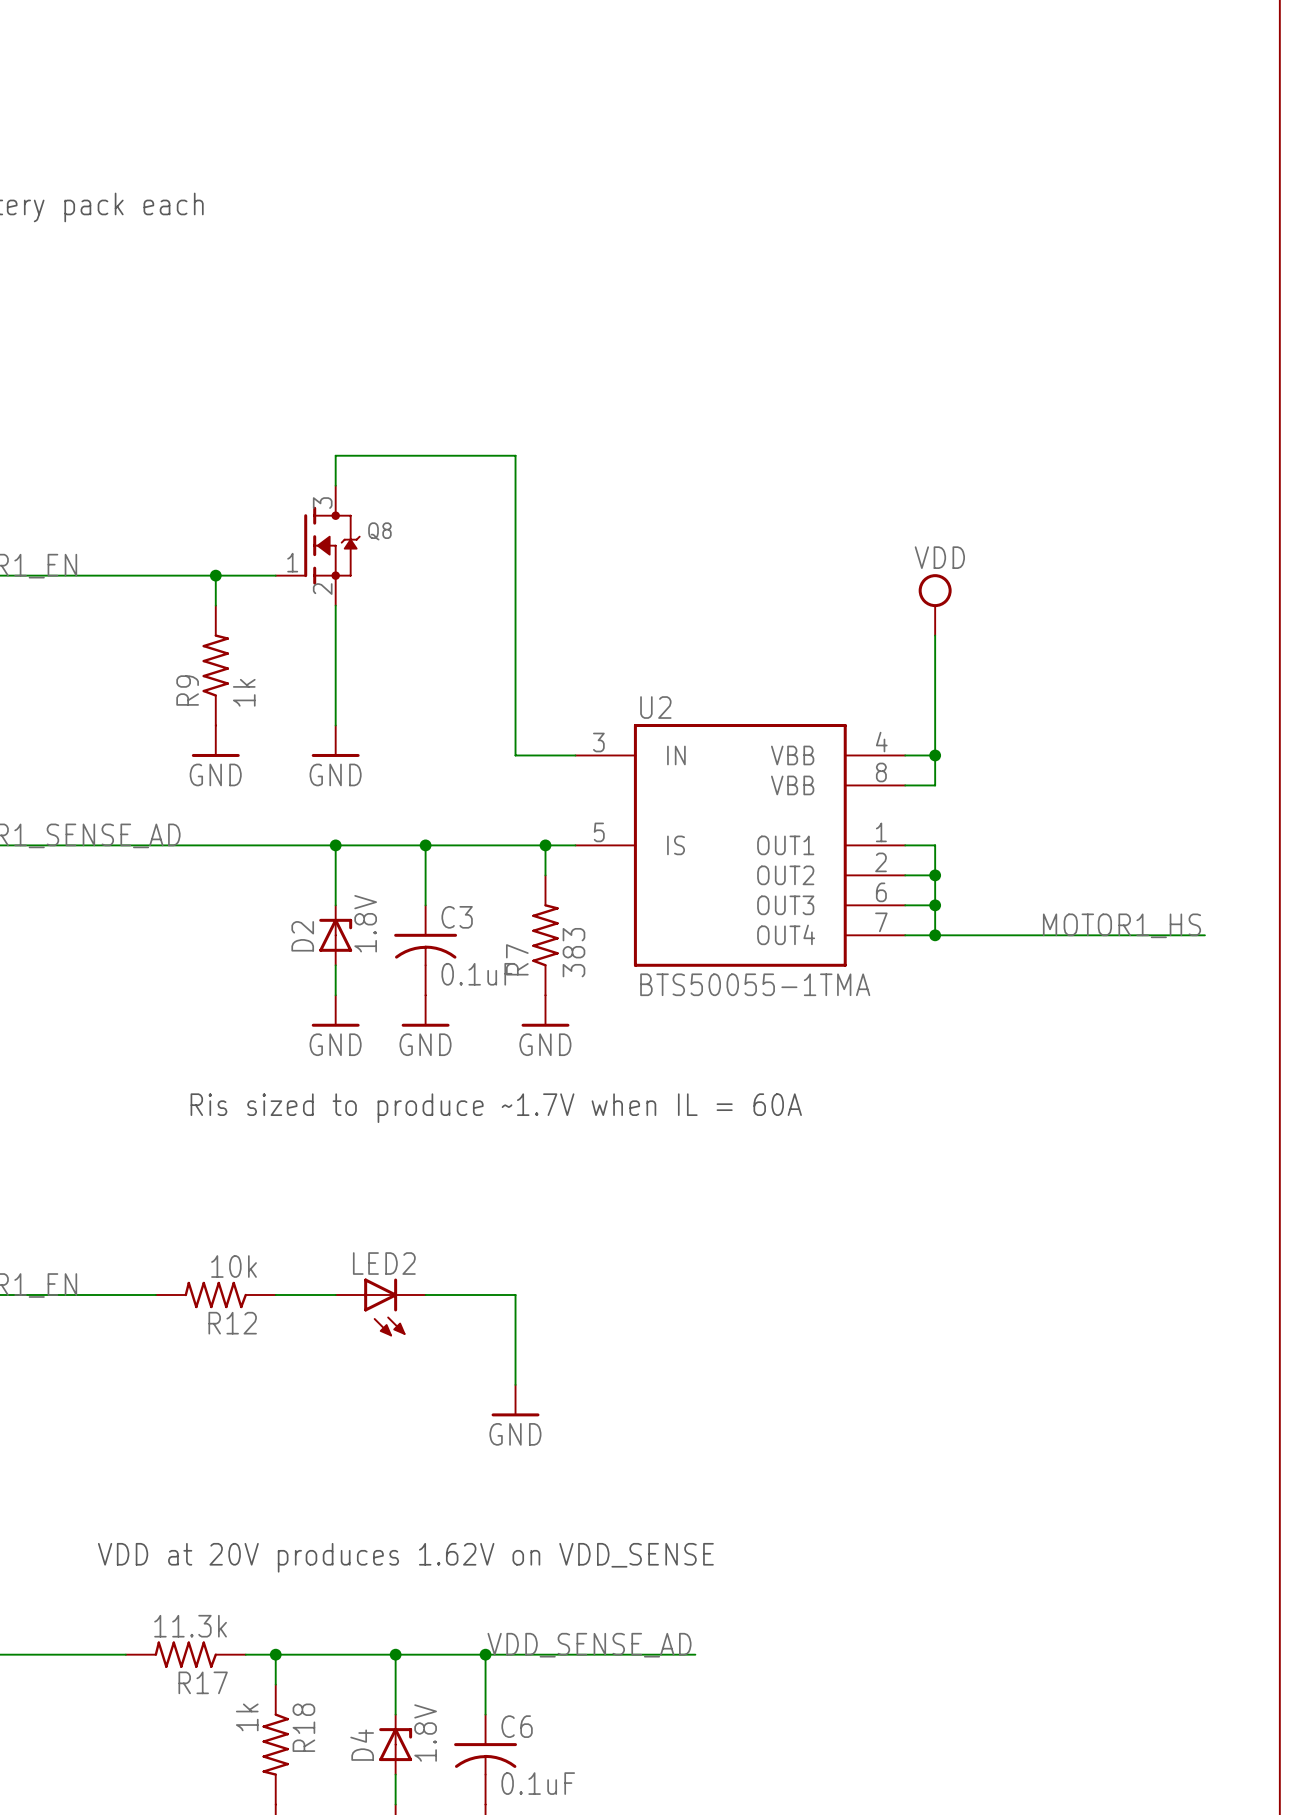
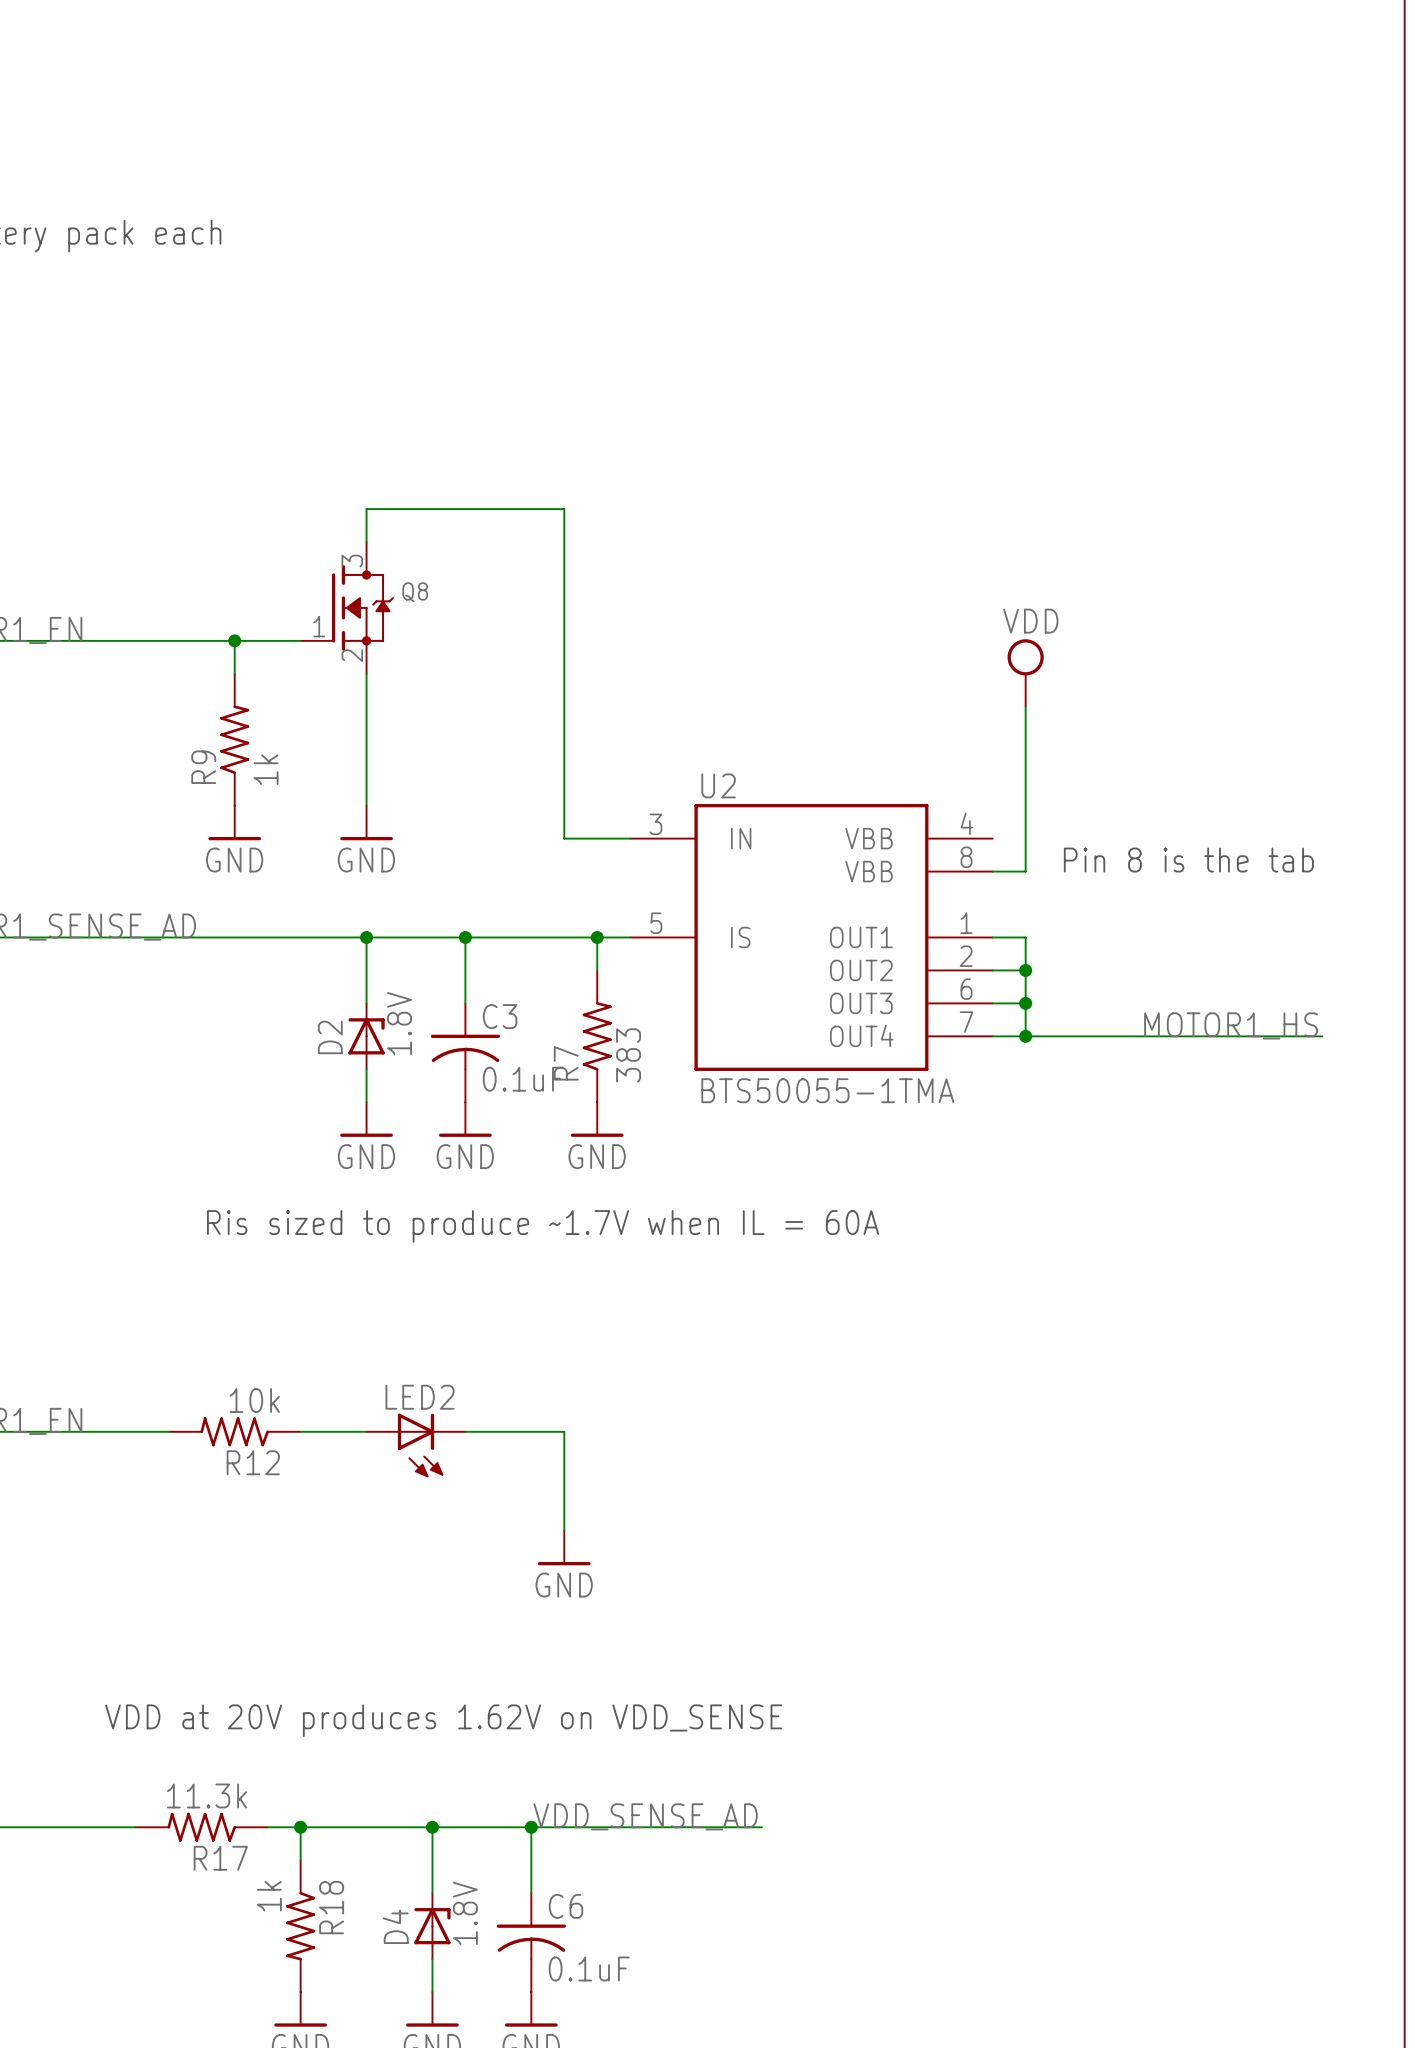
wire: (905, 755) (935, 755) -> none
junction: (935, 755) -> none
text: none -> Pin 8 is the tab (1188, 860)

